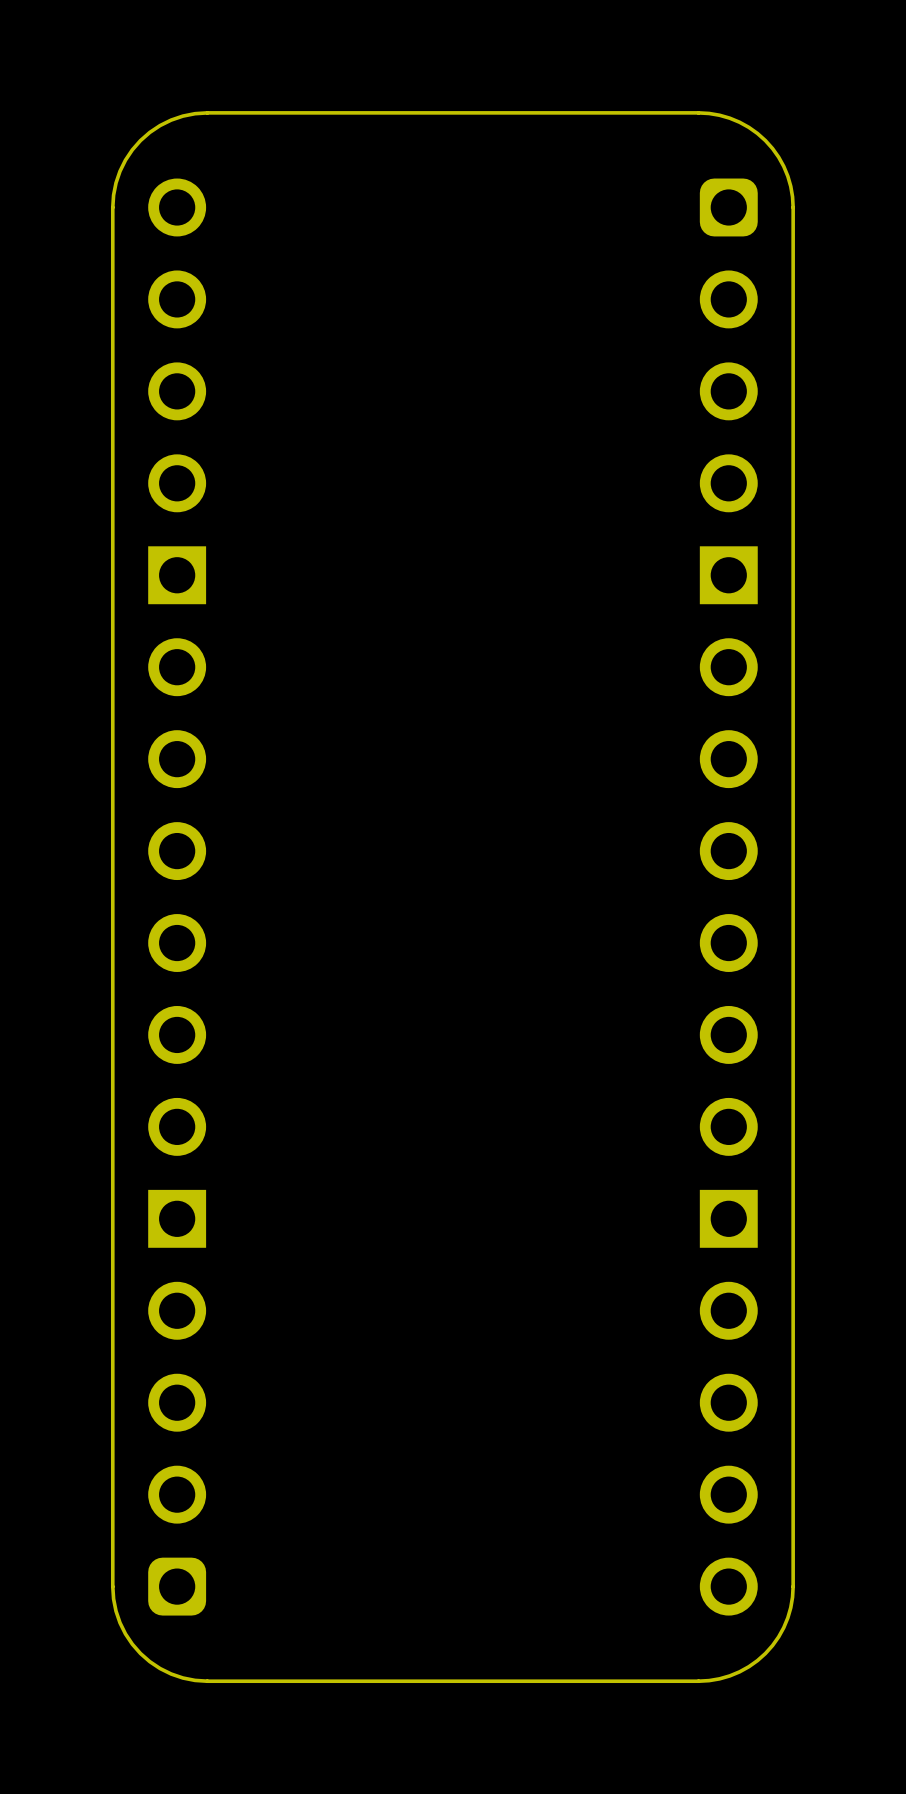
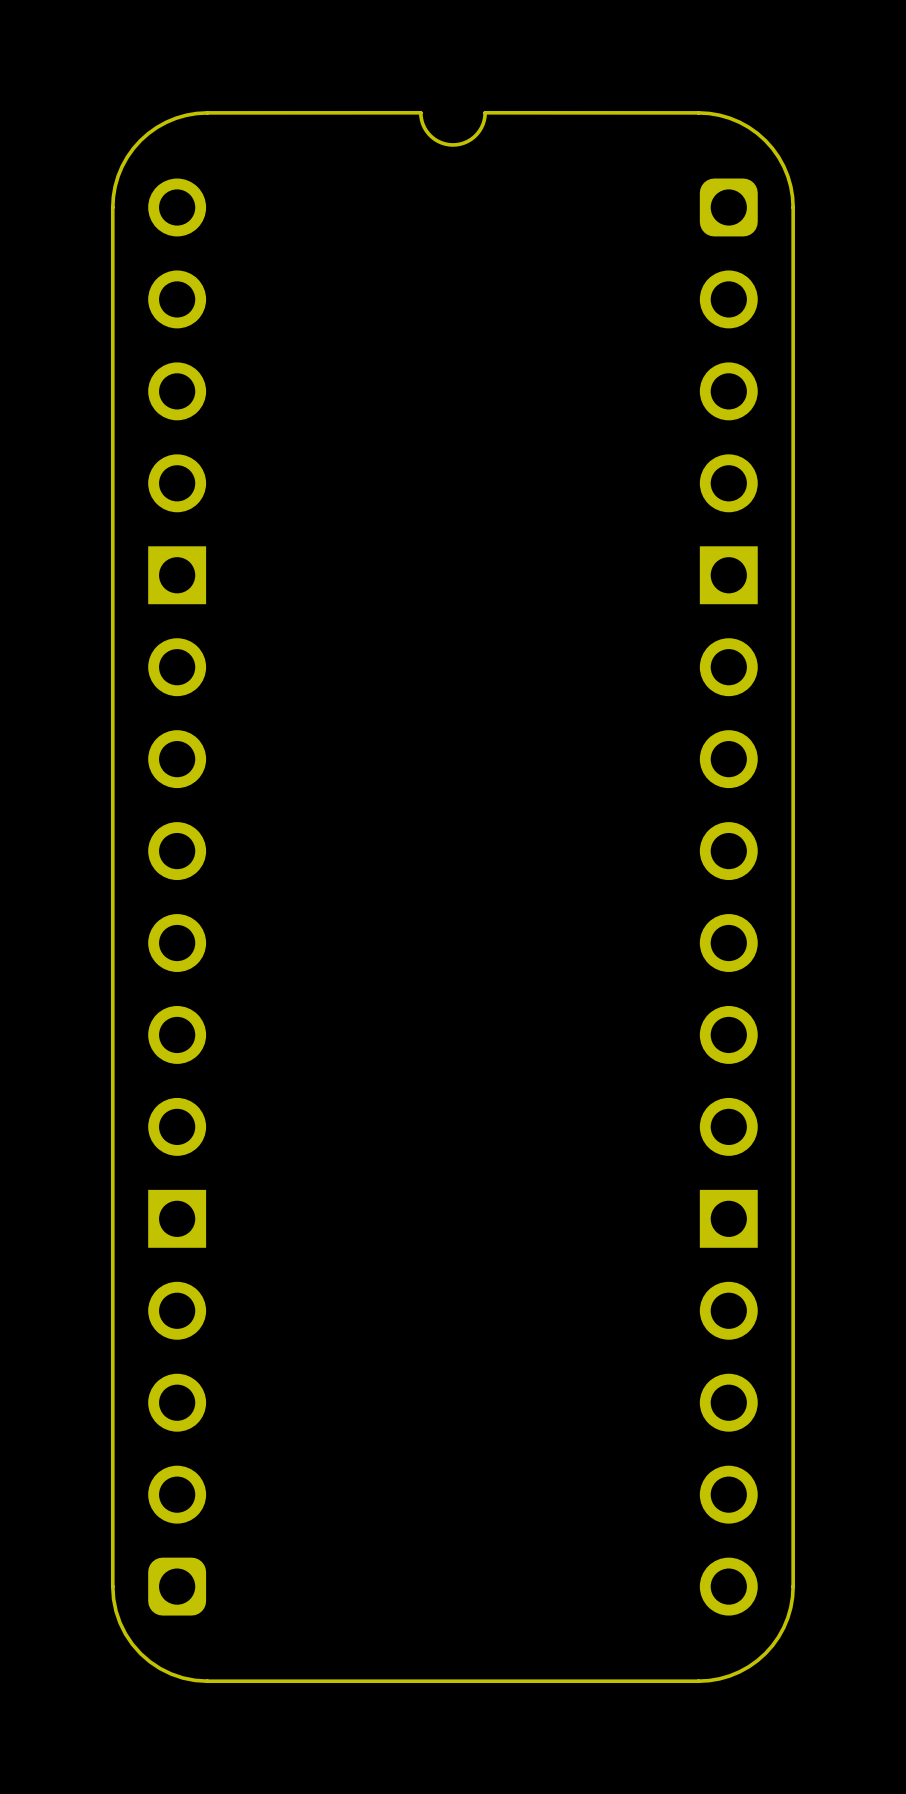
part footprint: [110, 111, 795, 1684] -> [110, 110, 795, 1684]

